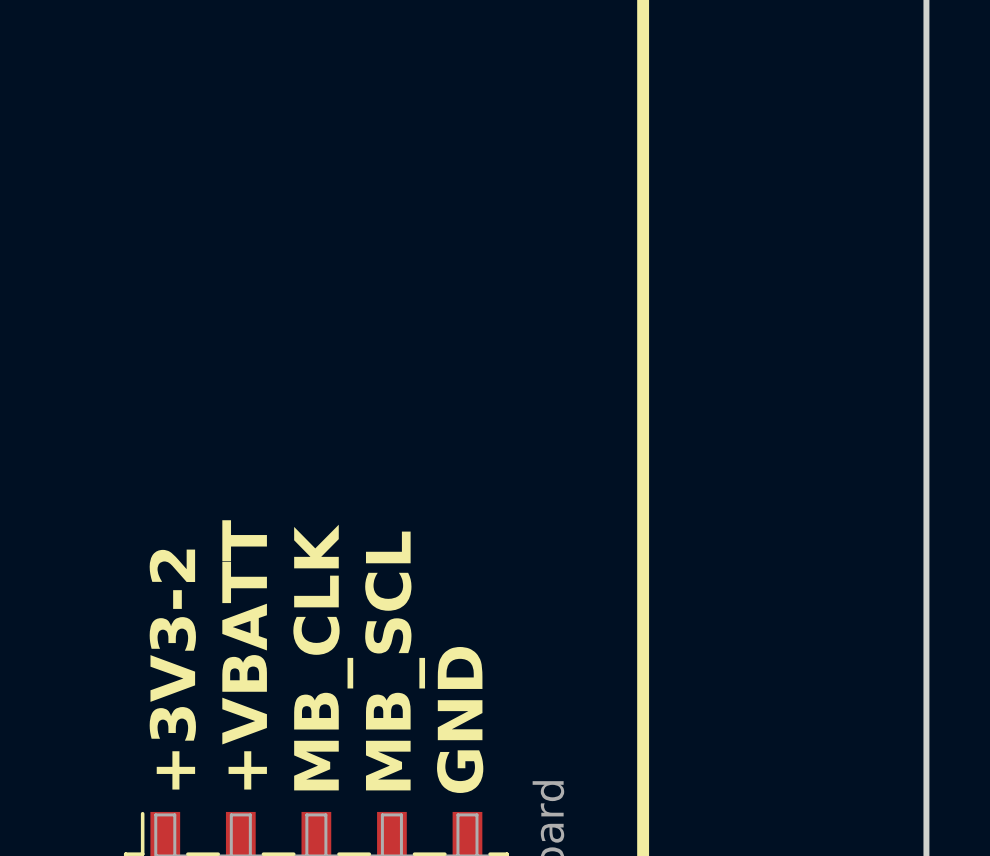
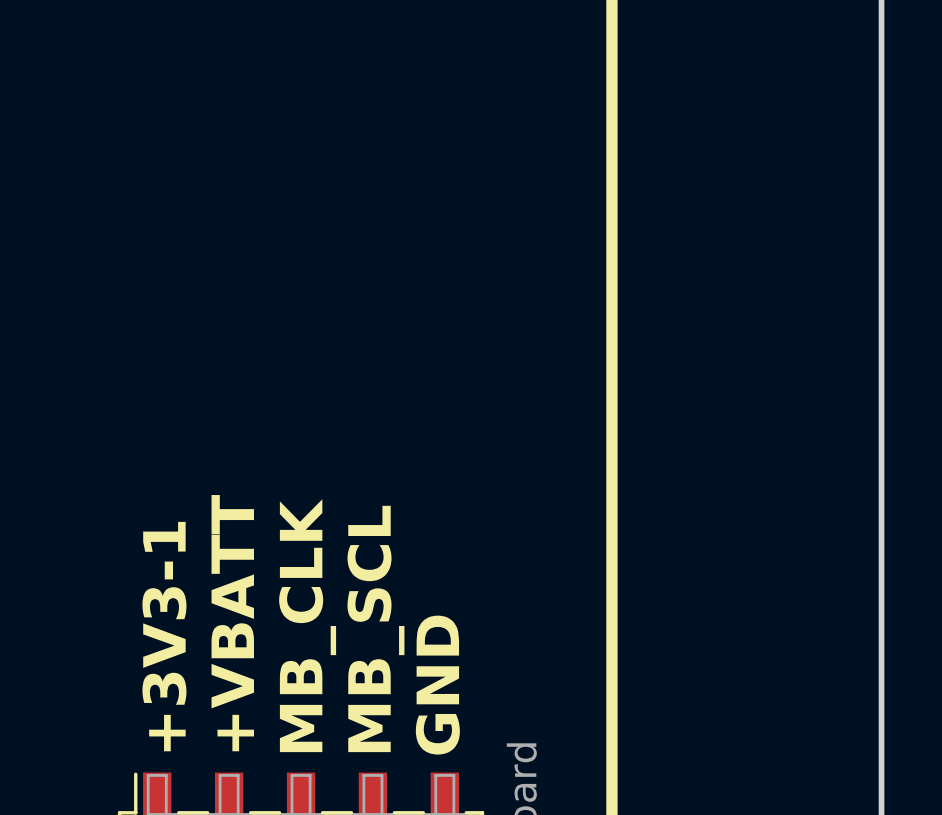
text: +3V3-2 (172, 669) -> +3V3-1 (164, 636)

